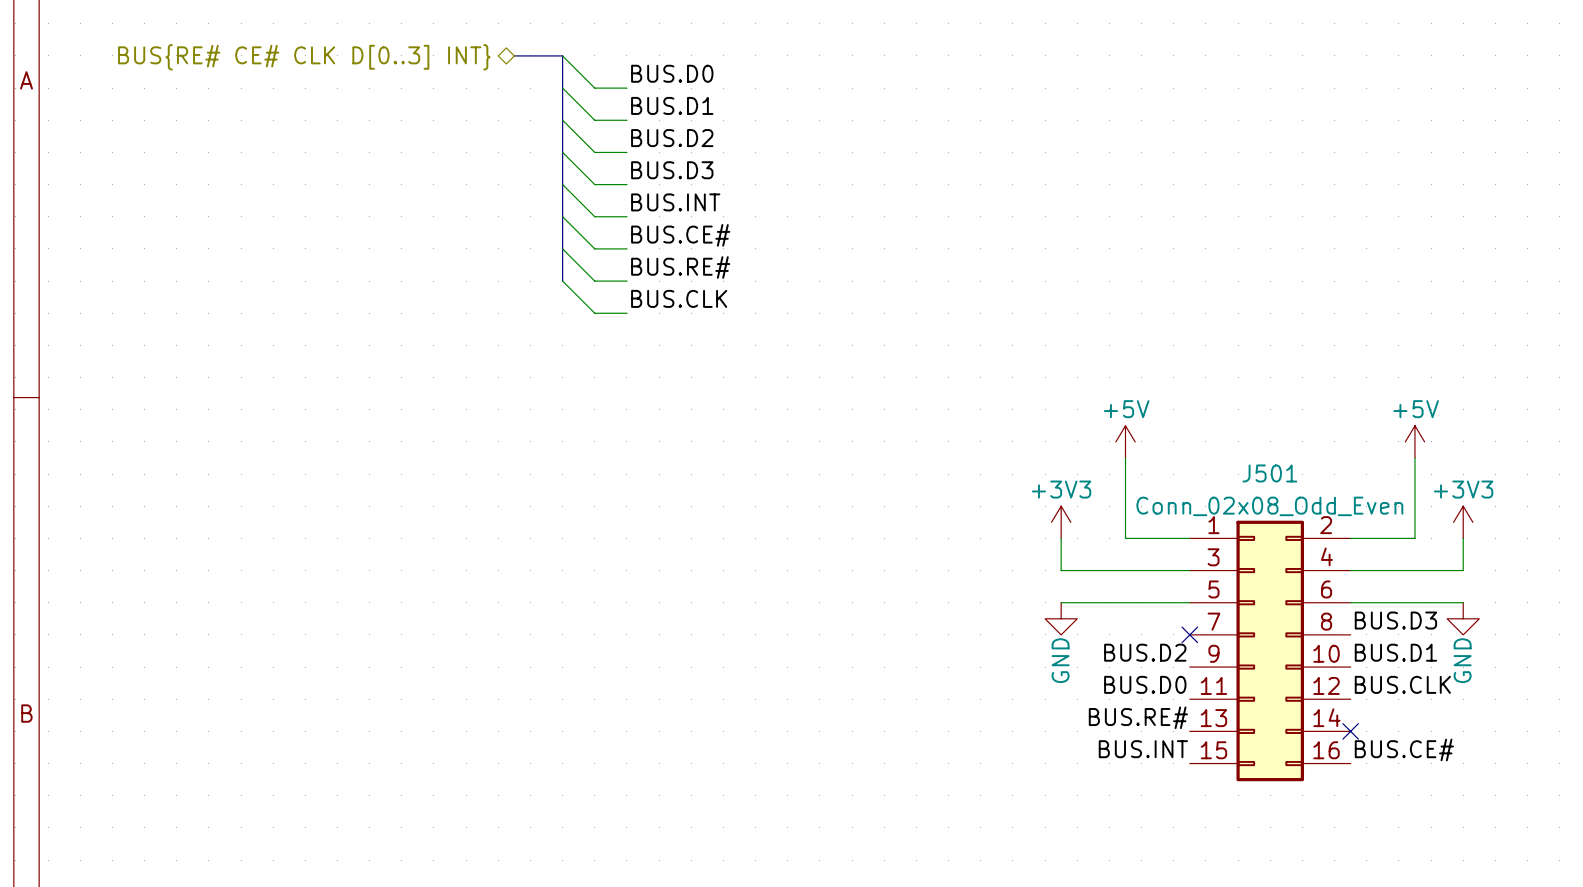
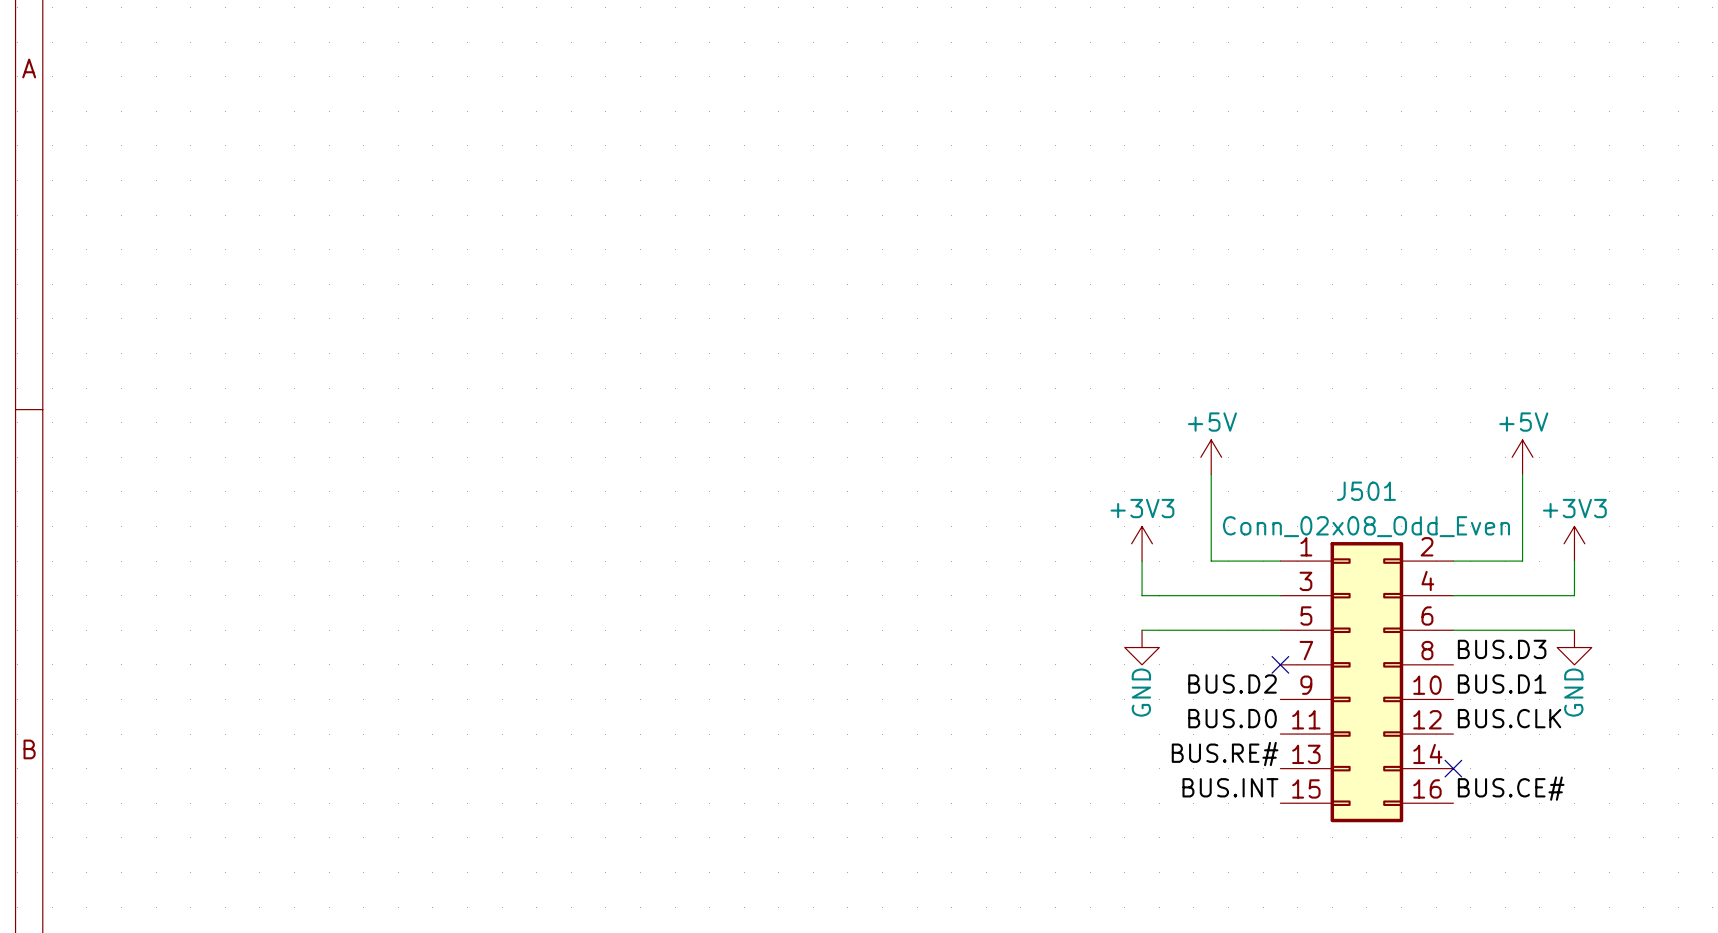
bus: (514, 55) (562, 55) (562, 281) -> none
wire: (562, 55) (594, 88) (626, 88) -> none
hierarchical label: BUS{RE# CE# CLK D[0..3] INT} (304, 57) -> none
label: BUS.D0 (672, 73) -> none
wire: (562, 88) (594, 120) (626, 120) -> none
label: BUS.D1 (672, 105) -> none
wire: (562, 120) (594, 152) (626, 152) -> none
label: BUS.D2 (672, 138) -> none
wire: (562, 152) (594, 184) (626, 184) -> none
label: BUS.D3 (672, 170) -> none
wire: (562, 184) (594, 216) (626, 216) -> none
label: BUS.INT (675, 202) -> none
wire: (562, 216) (594, 248) (626, 248) -> none
label: BUS.CE# (680, 235) -> none
wire: (562, 248) (594, 281) (626, 281) -> none
label: BUS.RE# (680, 267) -> none
wire: (562, 281) (594, 313) (626, 313) -> none
label: BUS.CLK (679, 298) -> none

